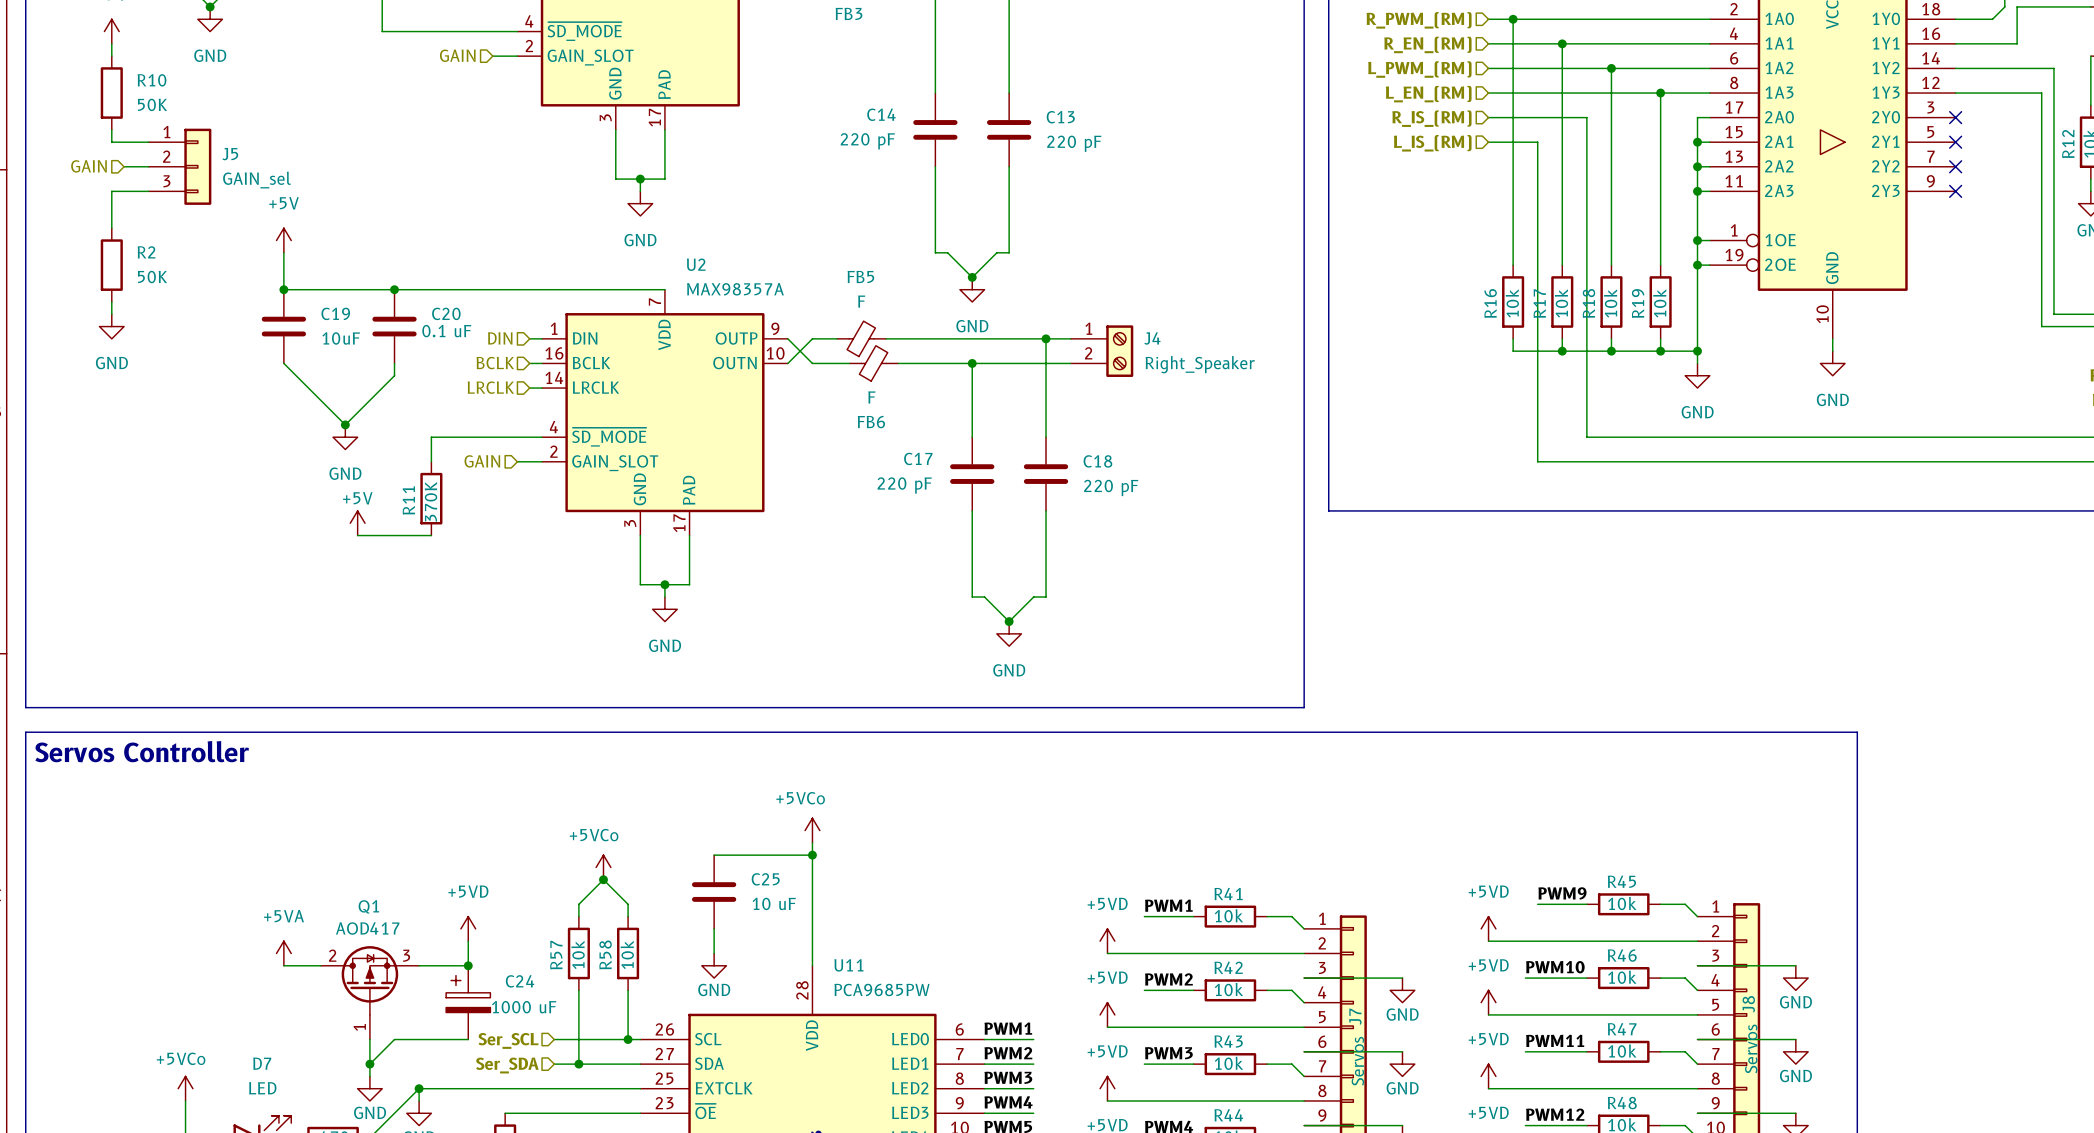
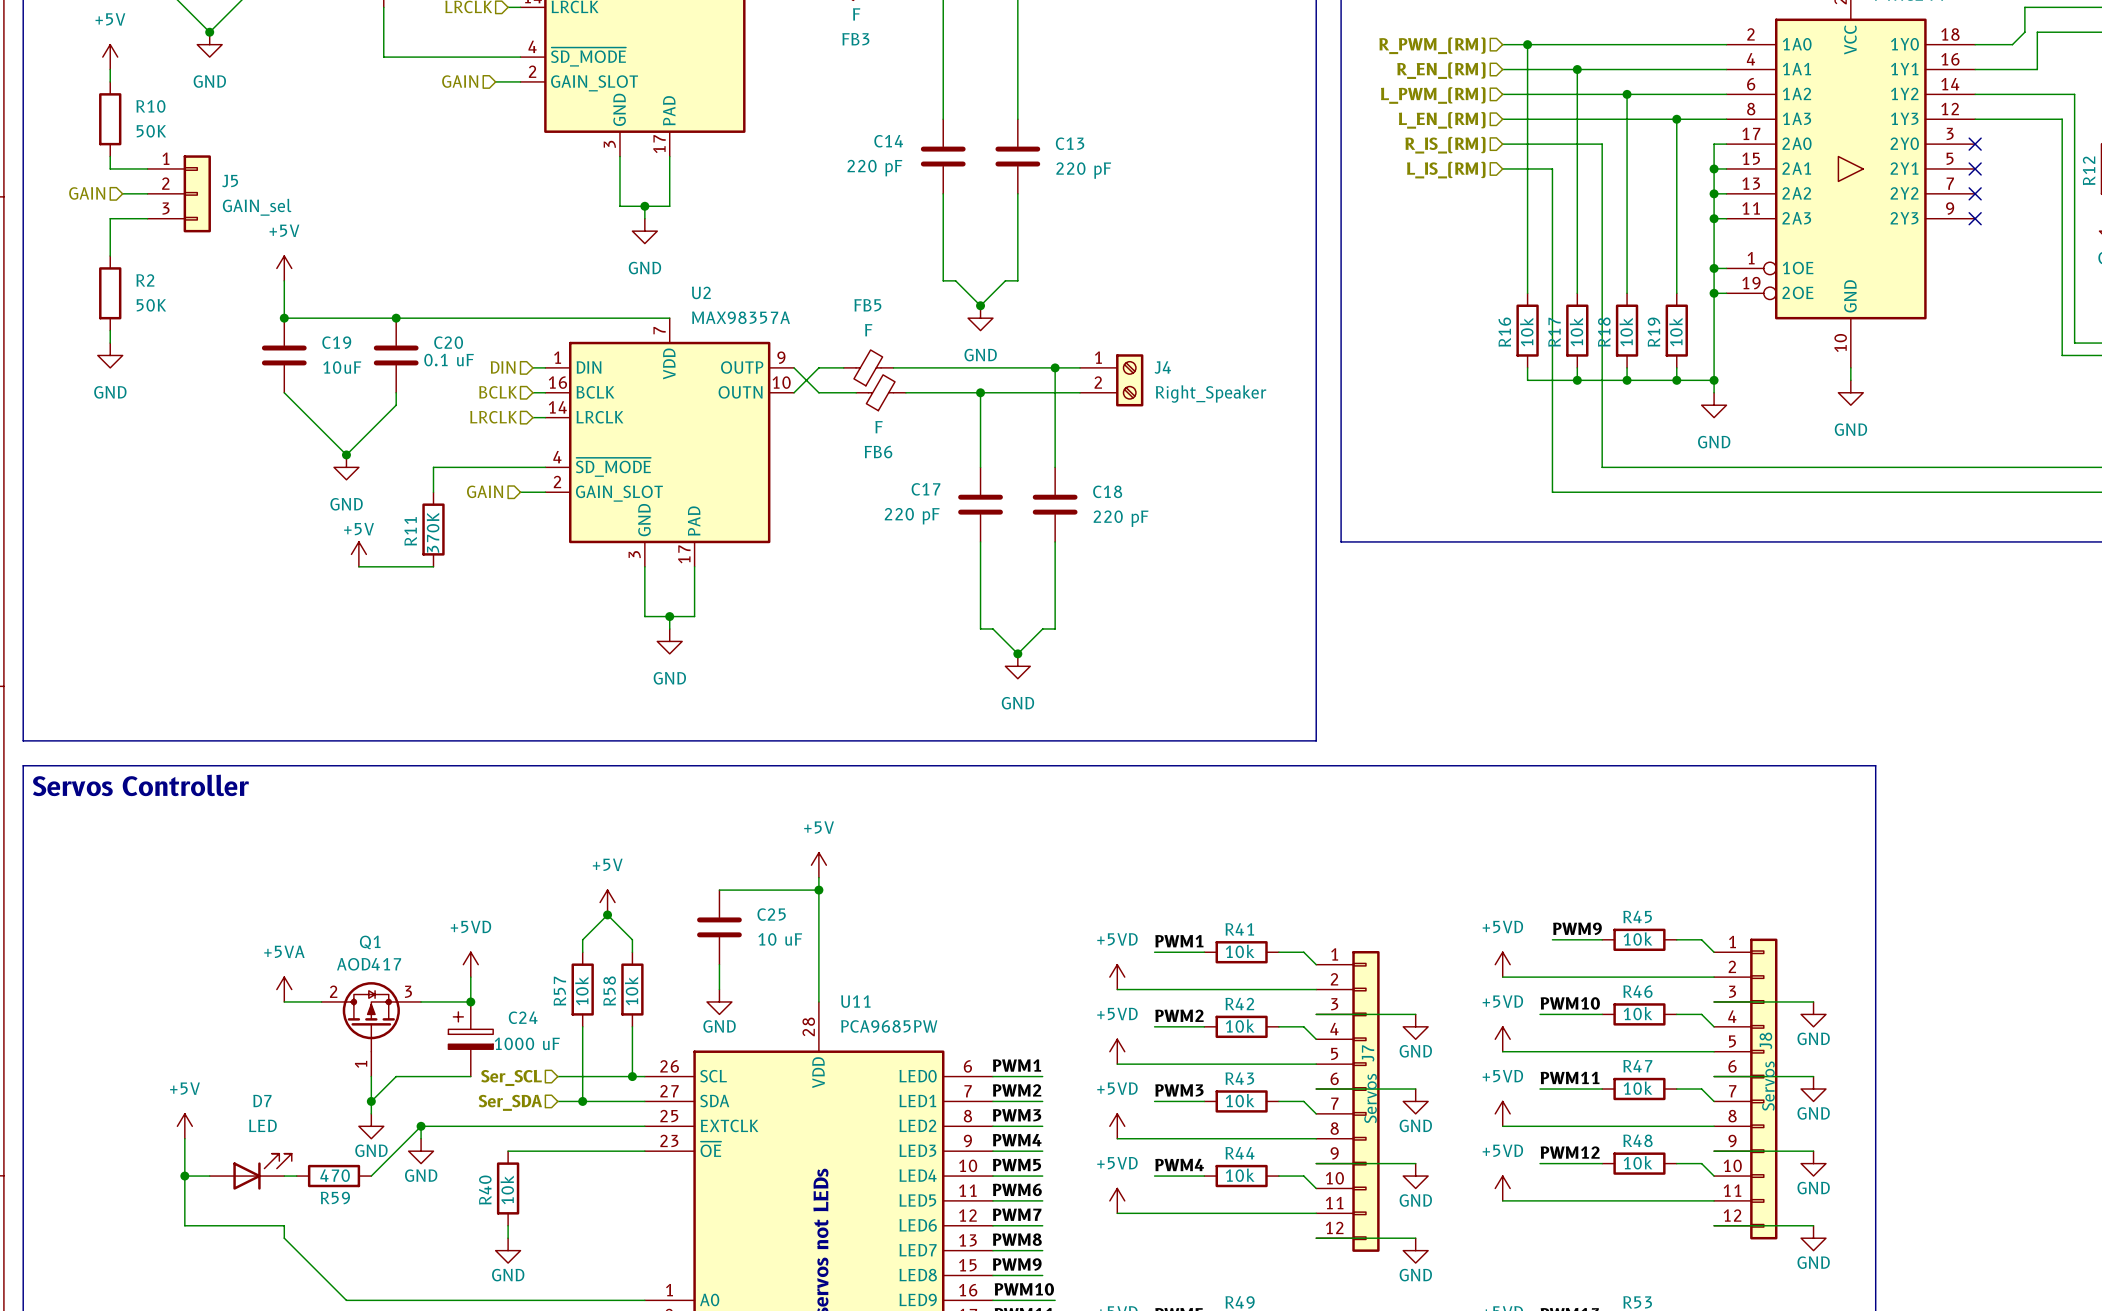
power symbol: +5VCo (812, 830) -> +5V (818, 865)
power symbol: +5VCo (603, 867) -> +5V (607, 902)
power symbol: +5VCo (185, 1088) -> +5V (184, 1126)

